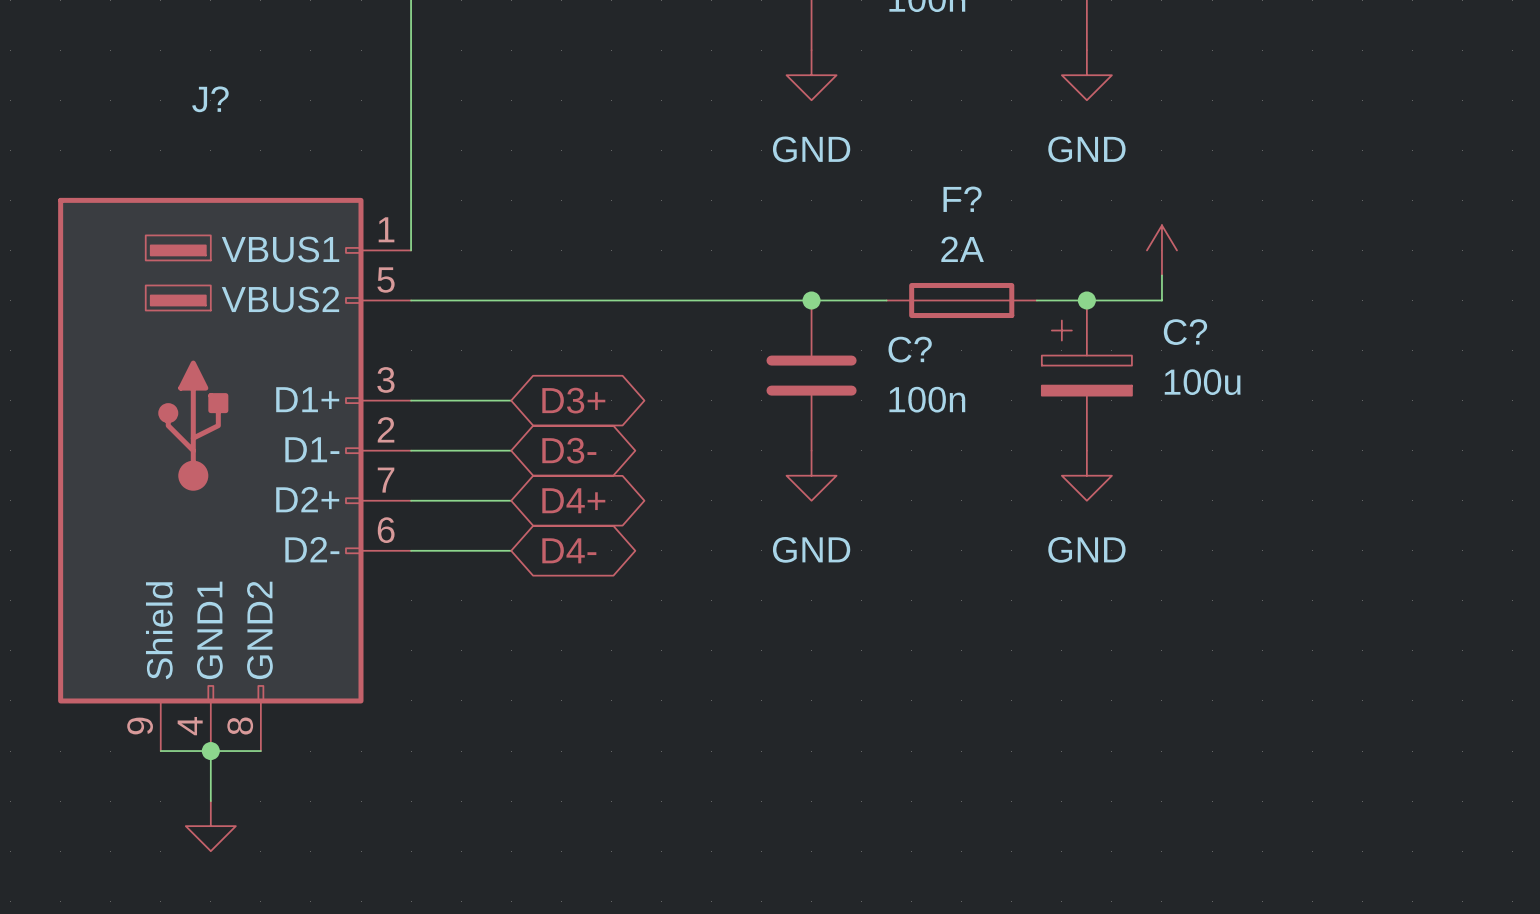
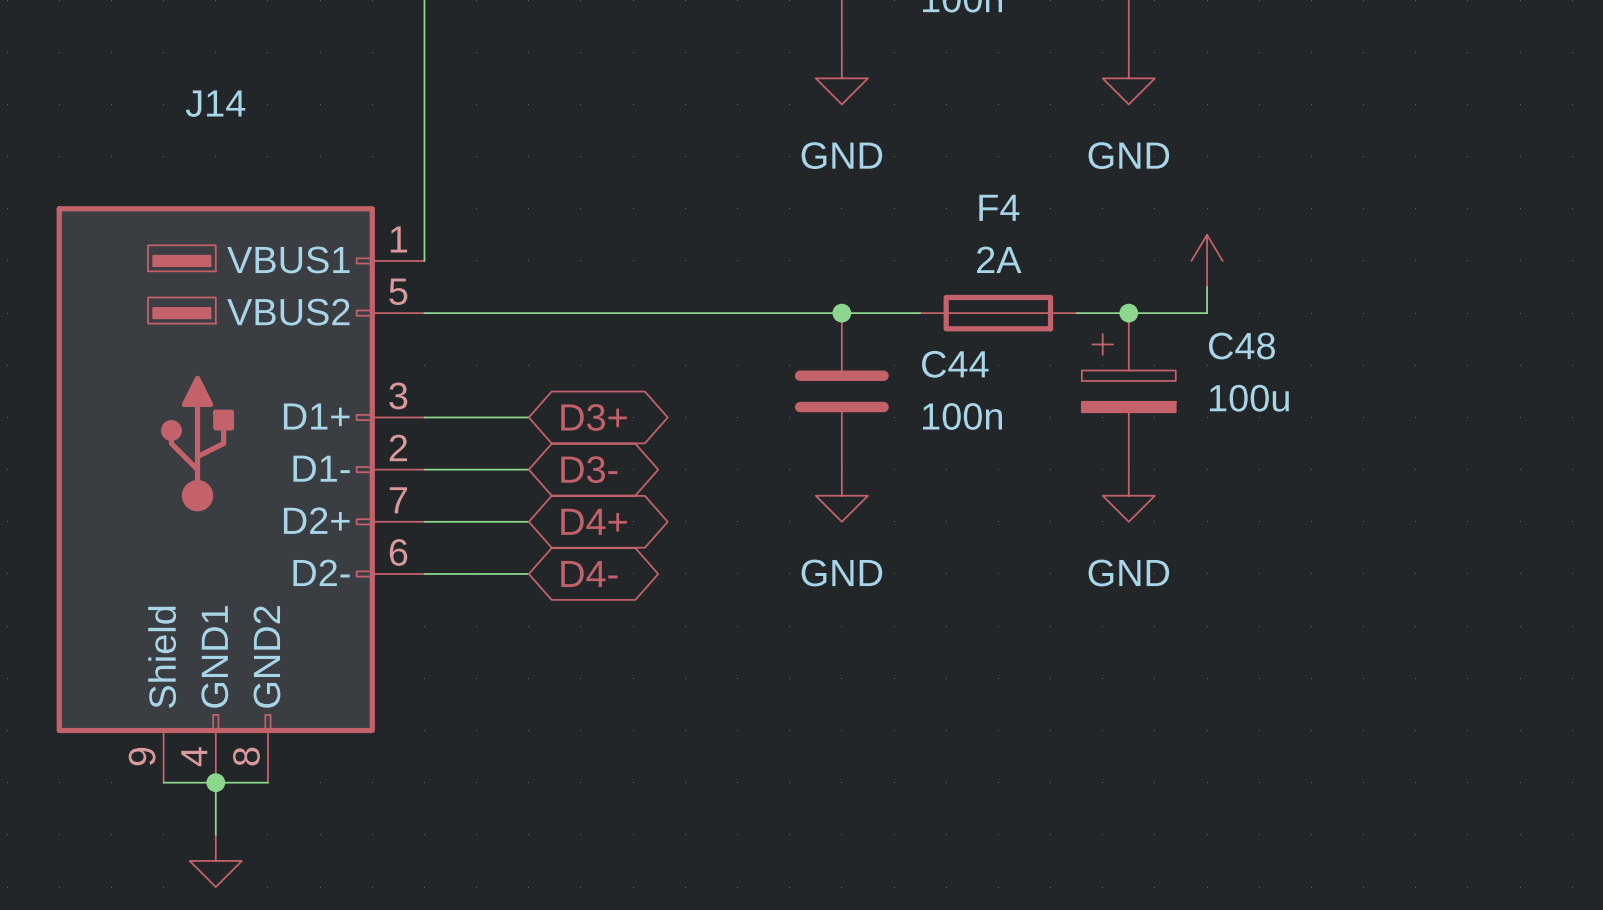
J? name: J? (210, 99) -> J14 (215, 103)
F? name: F? (962, 199) -> F4 (999, 207)
C? name: C? (1185, 332) -> C48 (1241, 346)
C? name: C? (910, 349) -> C44 (955, 364)

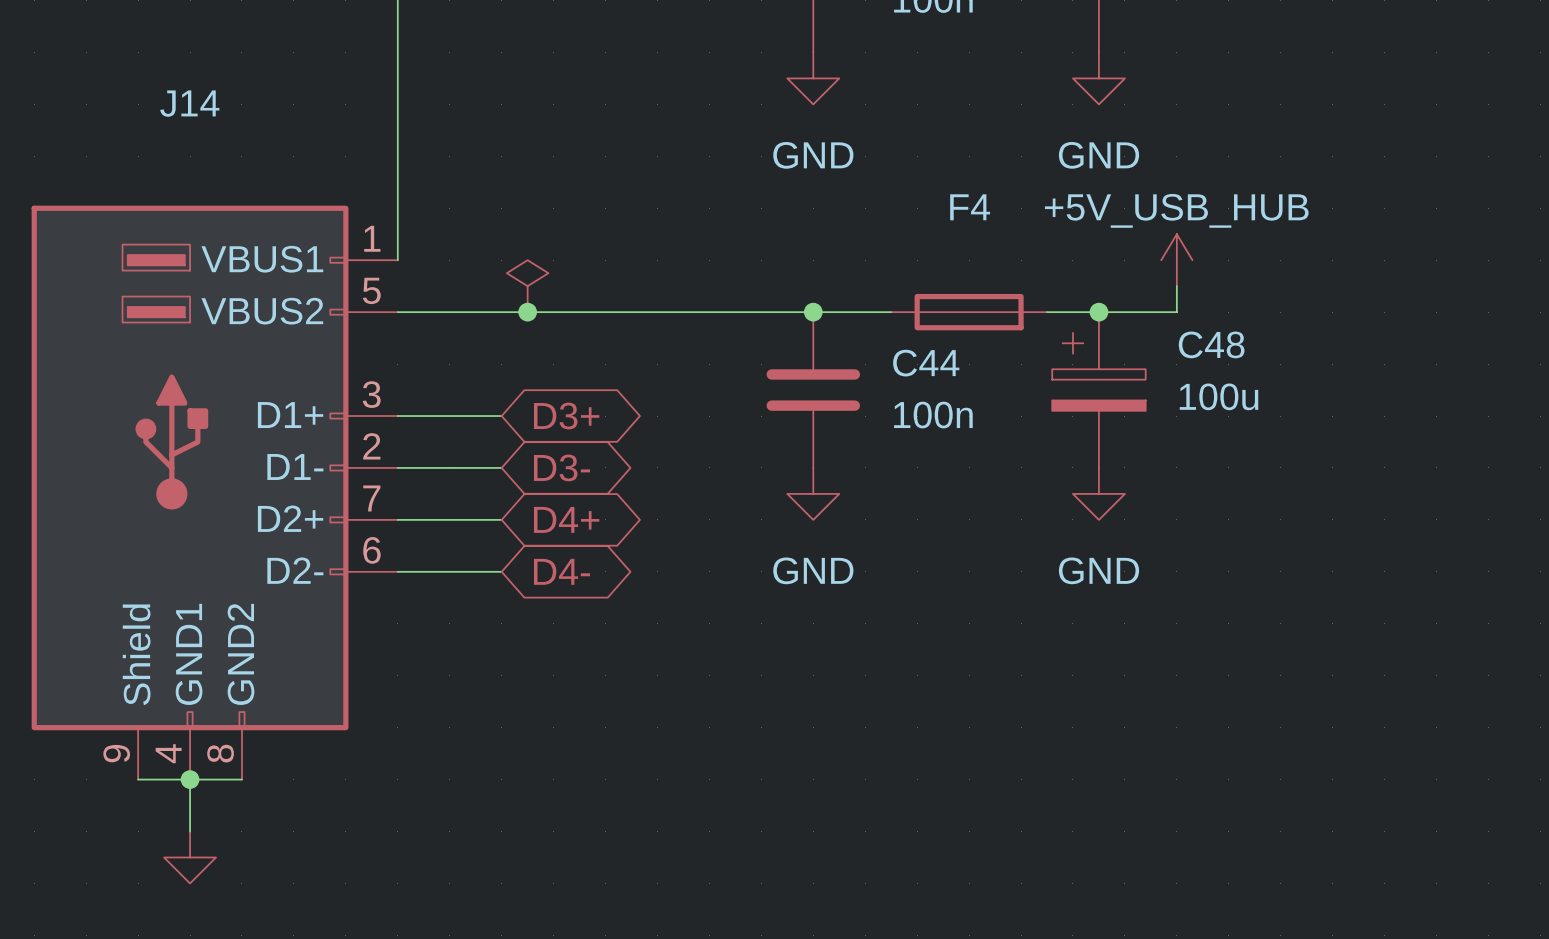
power symbol text: none -> +5V_USB_HUB (1176, 210)
F4 value: 2A (999, 259) -> none
power symbol: none -> (527, 286)
junction: none -> (527, 312)

